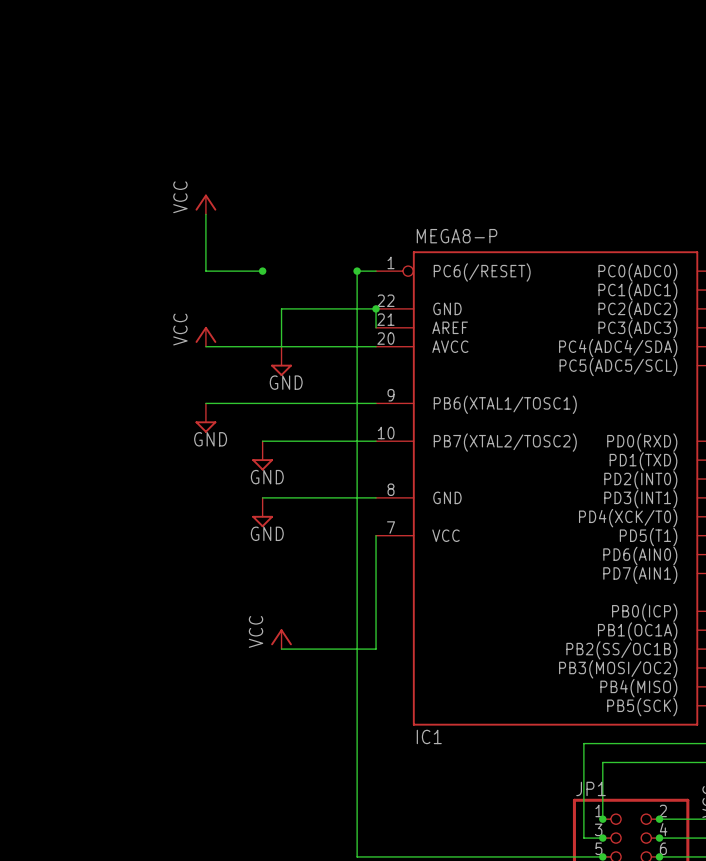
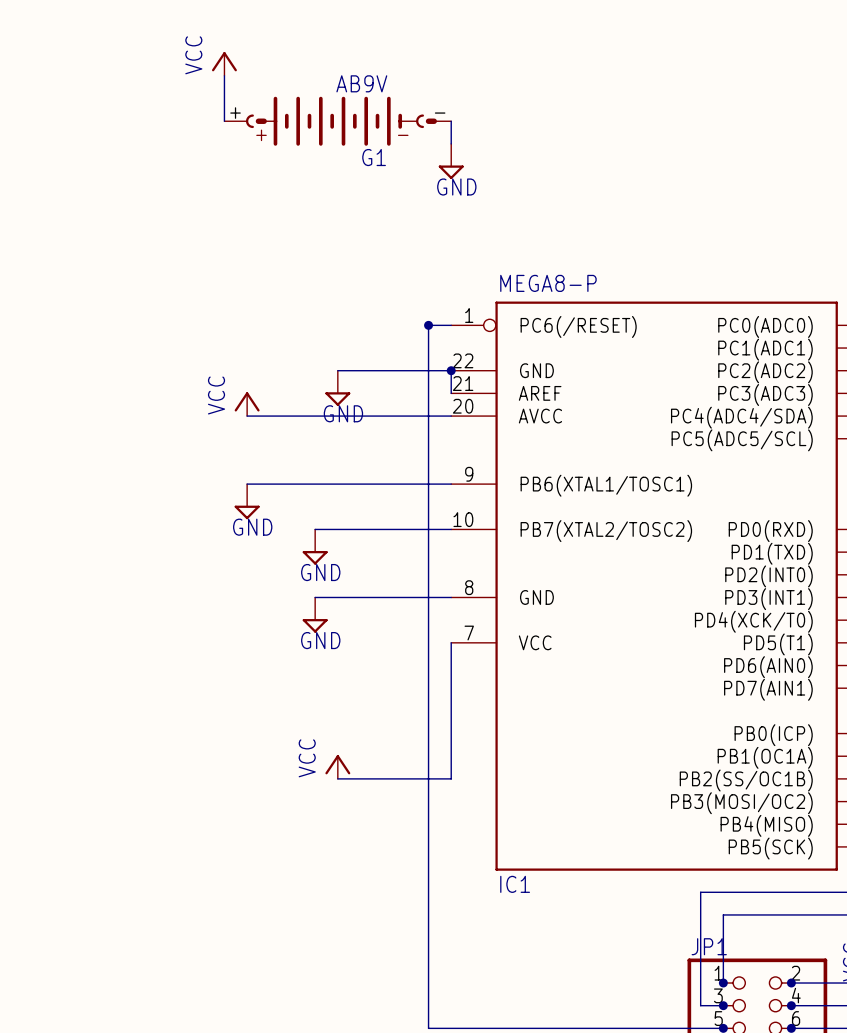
wire: none -> (224, 75) (224, 121)
G1: none -> AB9V (337, 121)
wire: none -> (451, 121) (451, 143)
power symbol: none -> GND (451, 161)
power symbol position: VCC (205, 204) -> VCC (224, 63)
wire: (205, 214) (205, 271) (262, 271) -> none
junction: (262, 271) -> none
power symbol position: GND (281, 361) -> GND (337, 388)

